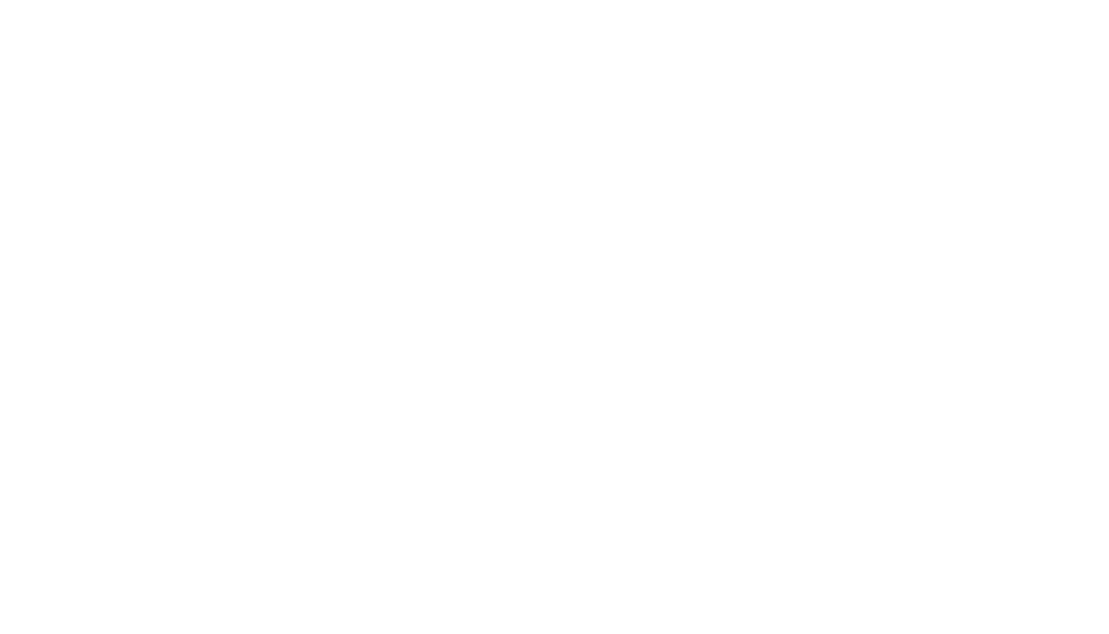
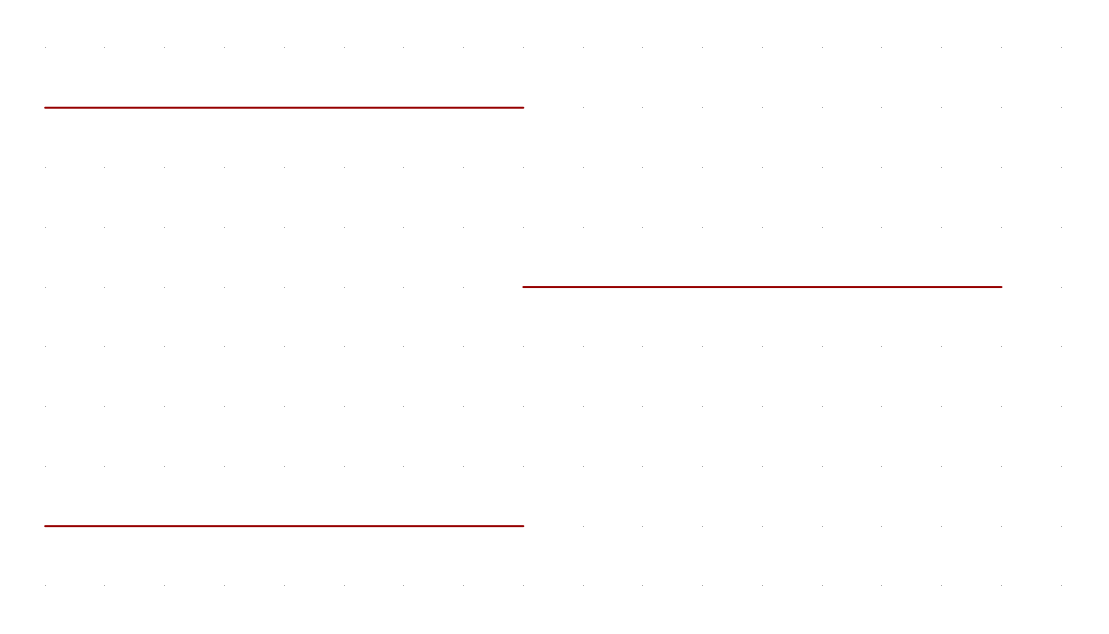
part: none -> (284, 107)
part: none -> (762, 287)
part: none -> (284, 526)

